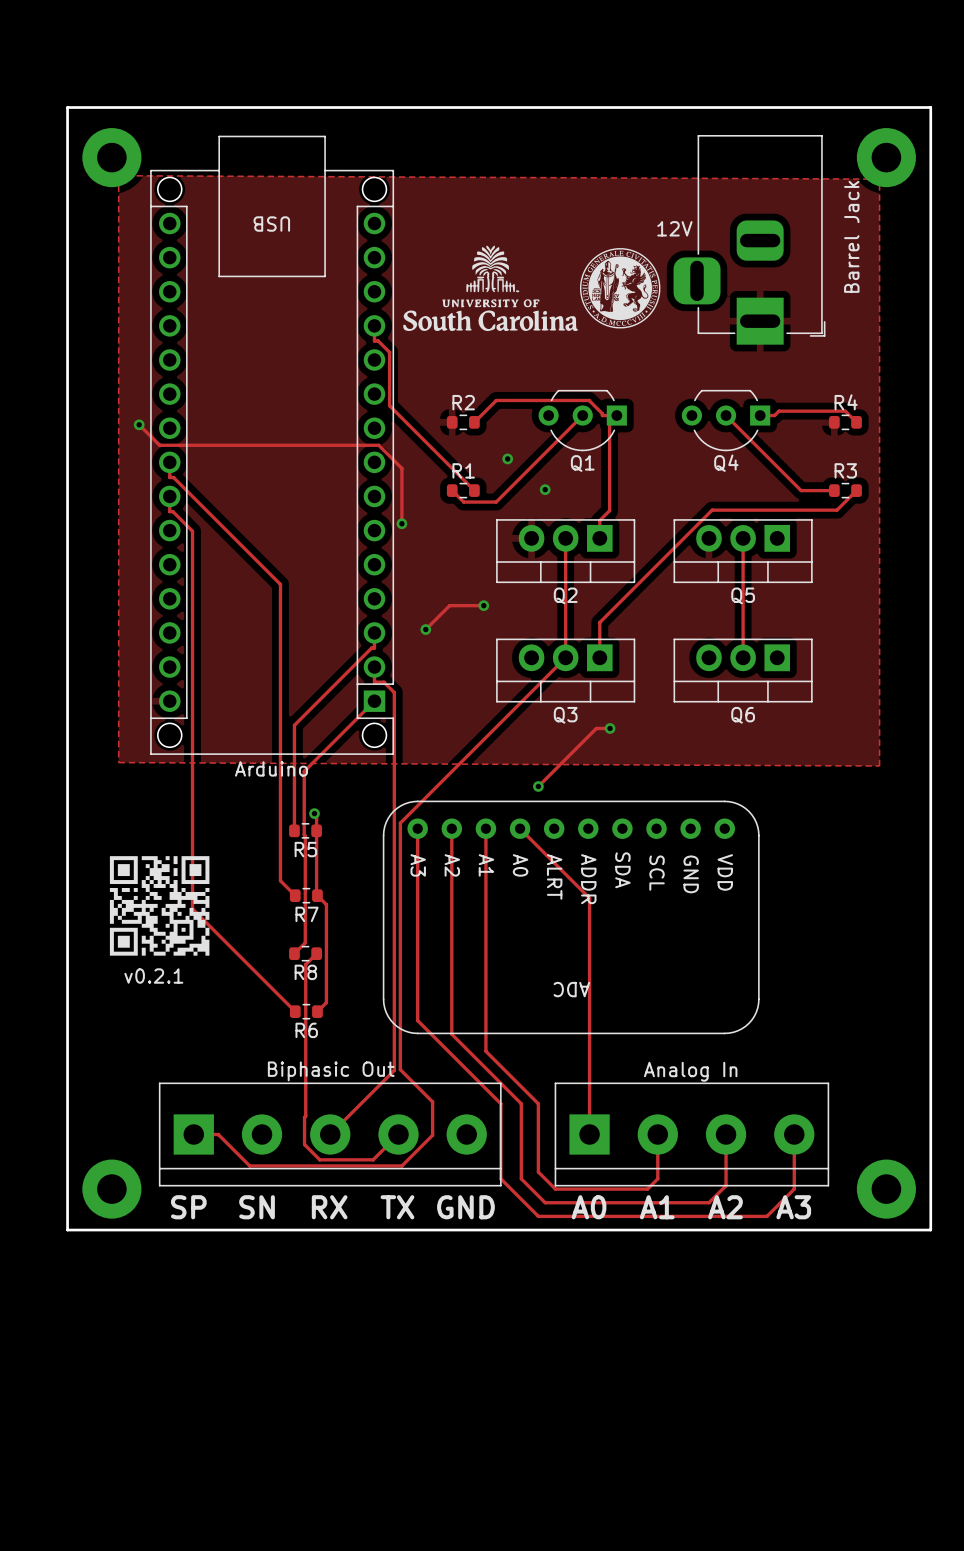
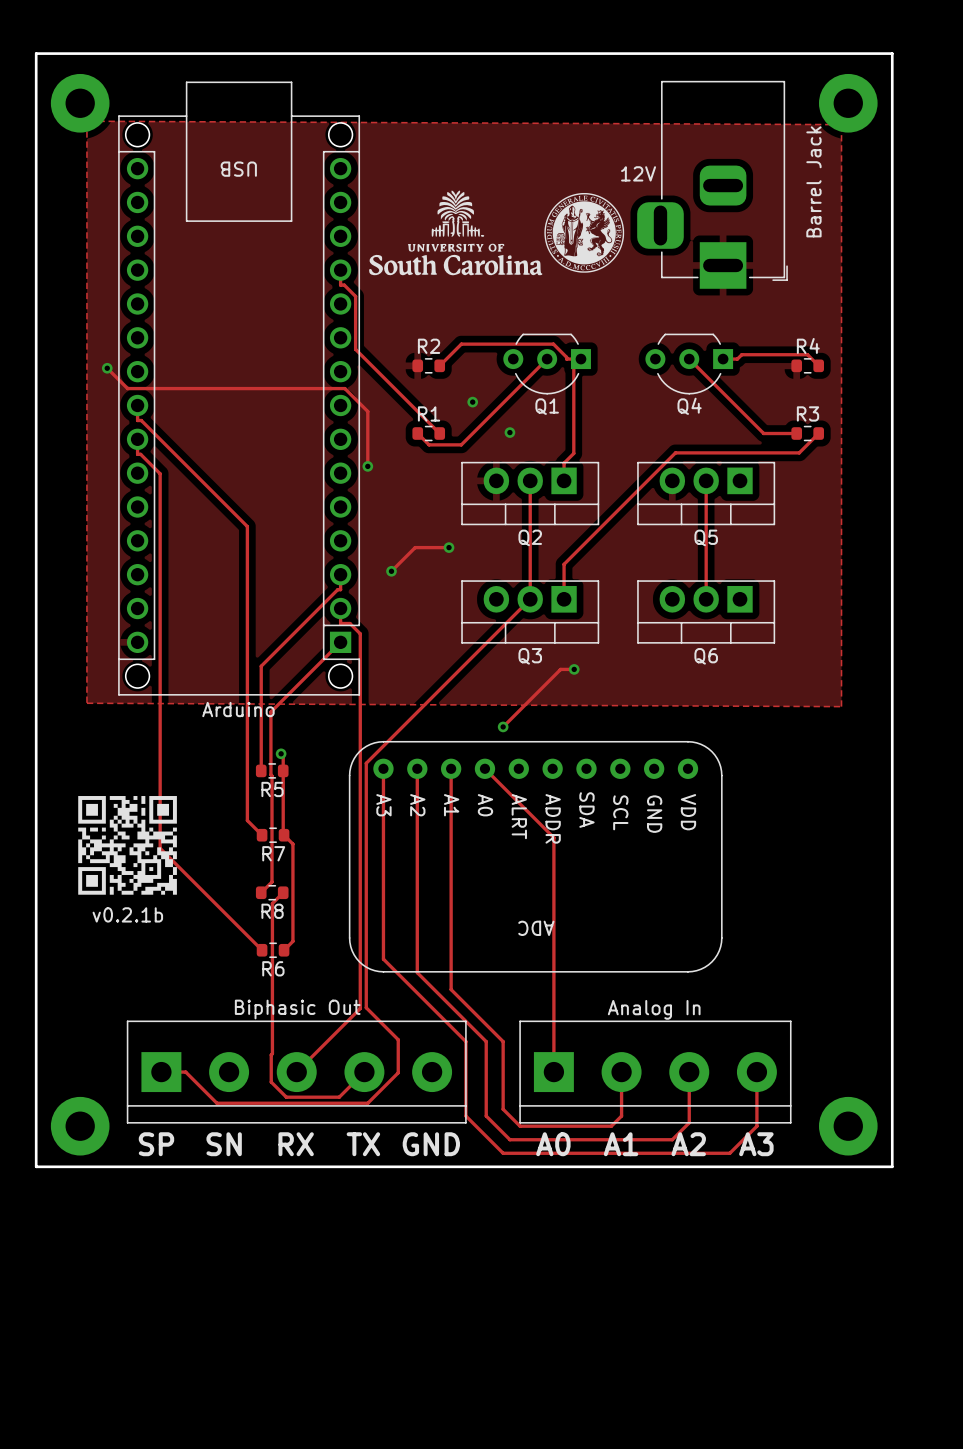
text: v0.2.1 (153, 976) -> v0.2.1b (127, 914)

